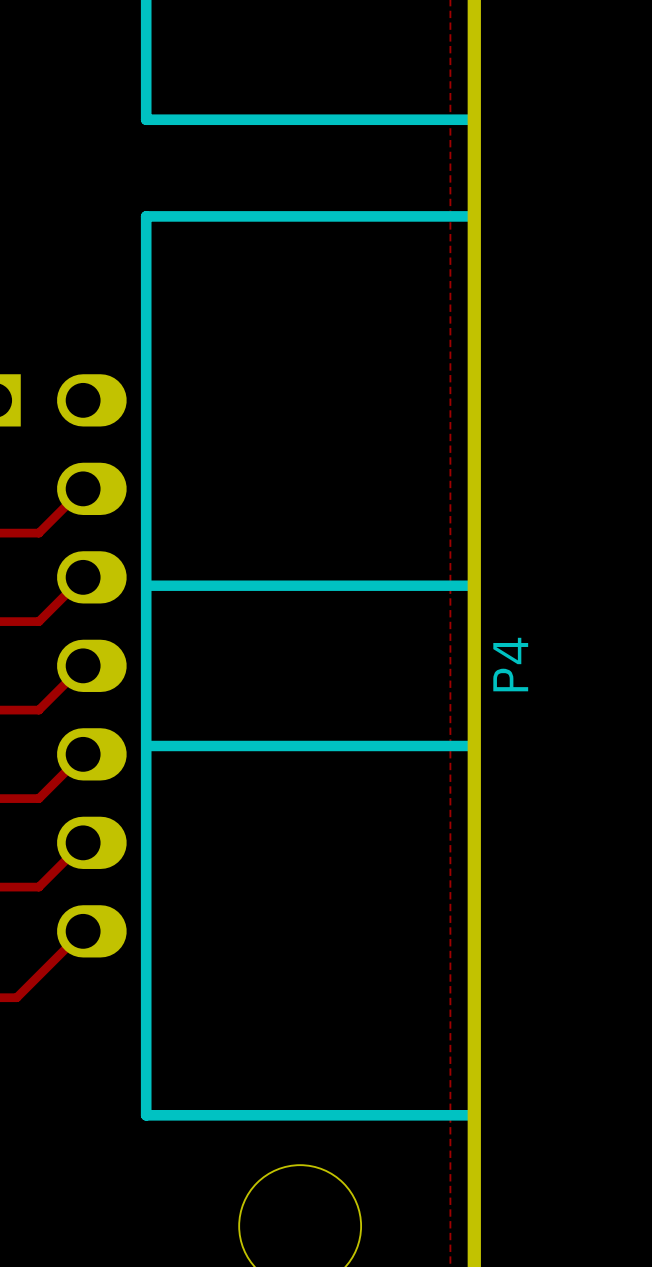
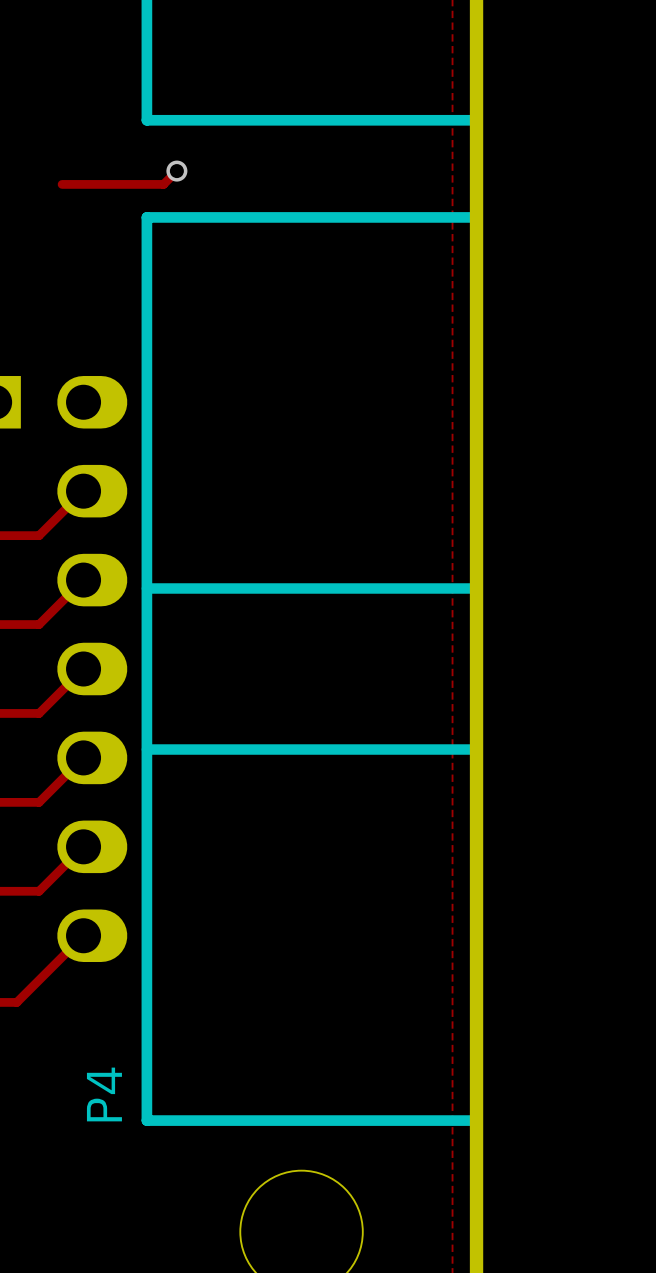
track: none -> (176, 171) (163, 184) (62, 184)
via: none -> (176, 171)
P4 name position: P4 (510, 664) -> P4 (104, 1094)

